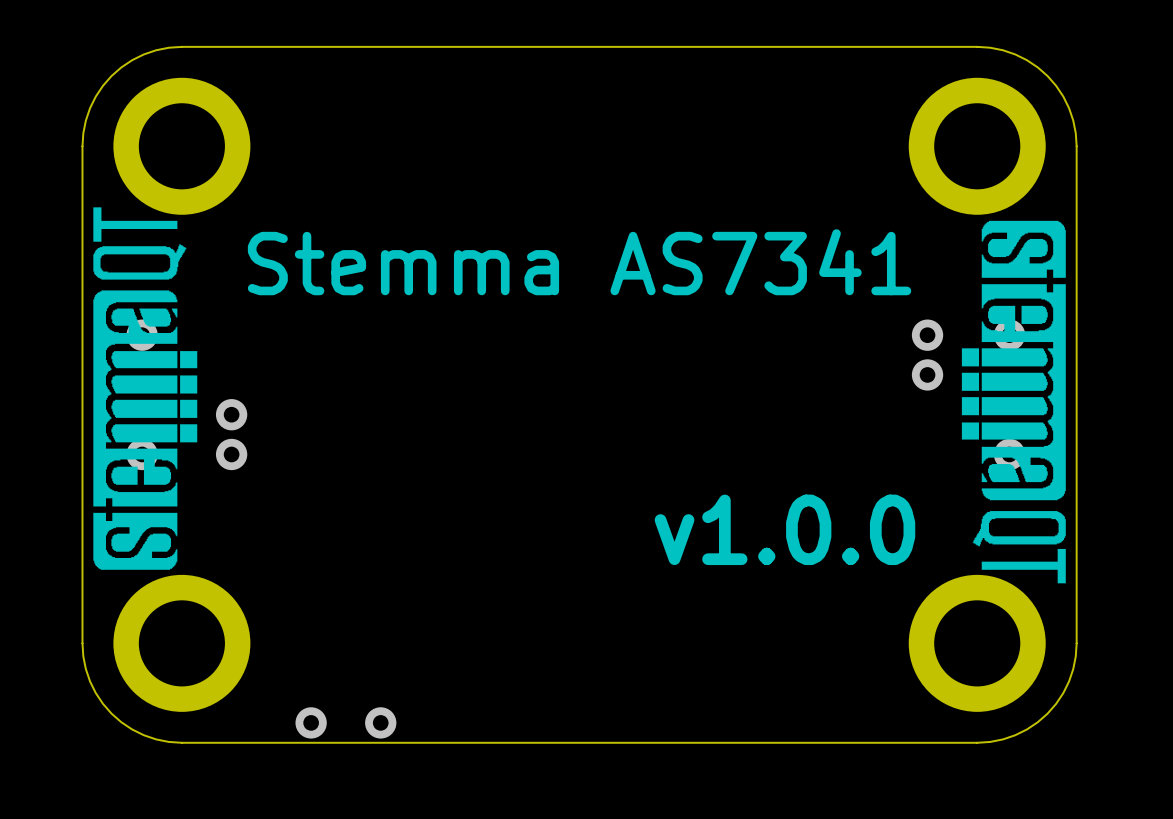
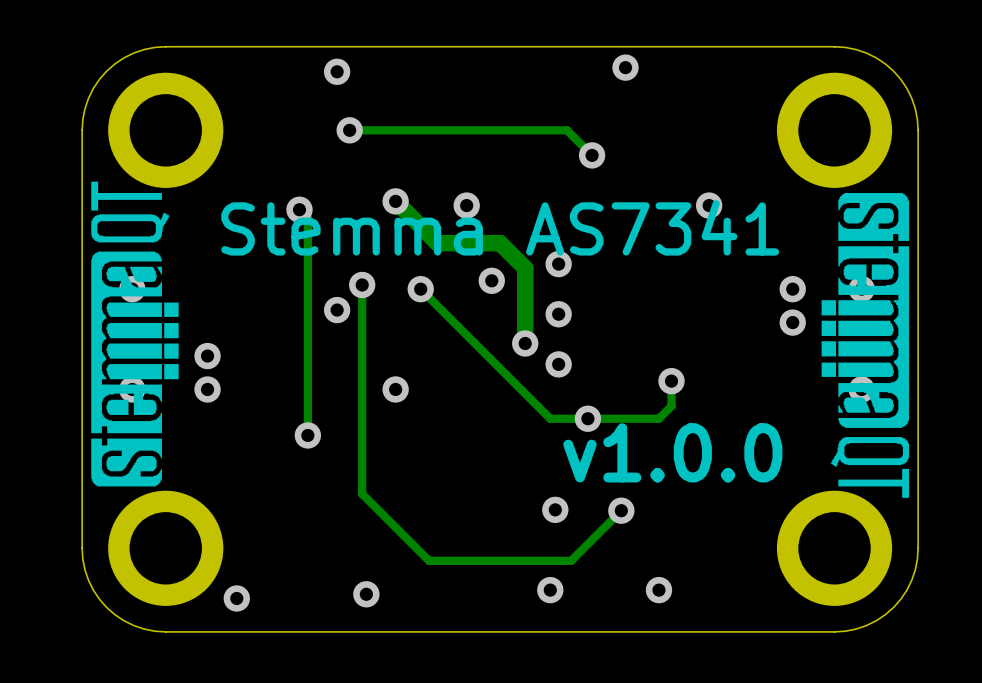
via: none -> (625, 67)
via: none -> (337, 71)
track: none -> (349, 130) (567, 130) (592, 155)
via: none -> (349, 130)
via: none -> (592, 155)
track: none -> (395, 201) (437, 243) (500, 243) (525, 268) (525, 343)
via: none -> (395, 201)
via: none -> (466, 205)
via: none -> (709, 205)
track: none -> (299, 209) (307, 218) (307, 435)
via: none -> (299, 209)
via: none -> (558, 264)
via: none -> (491, 280)
track: none -> (362, 284) (362, 493) (429, 560) (571, 560) (621, 510)
via: none -> (362, 284)
track: none -> (420, 289) (550, 418) (658, 418) (671, 406) (671, 381)
via: none -> (420, 289)
via: none -> (337, 310)
via: none -> (558, 314)
via: none -> (525, 343)
via: none -> (558, 364)
via: none -> (671, 381)
via: none -> (395, 389)
via: none -> (587, 418)
via: none -> (307, 435)
via: none -> (555, 509)
via: none -> (621, 510)
via: none -> (550, 590)
via: none -> (658, 590)
via position: (311, 722) -> (236, 598)
via position: (380, 722) -> (366, 594)

